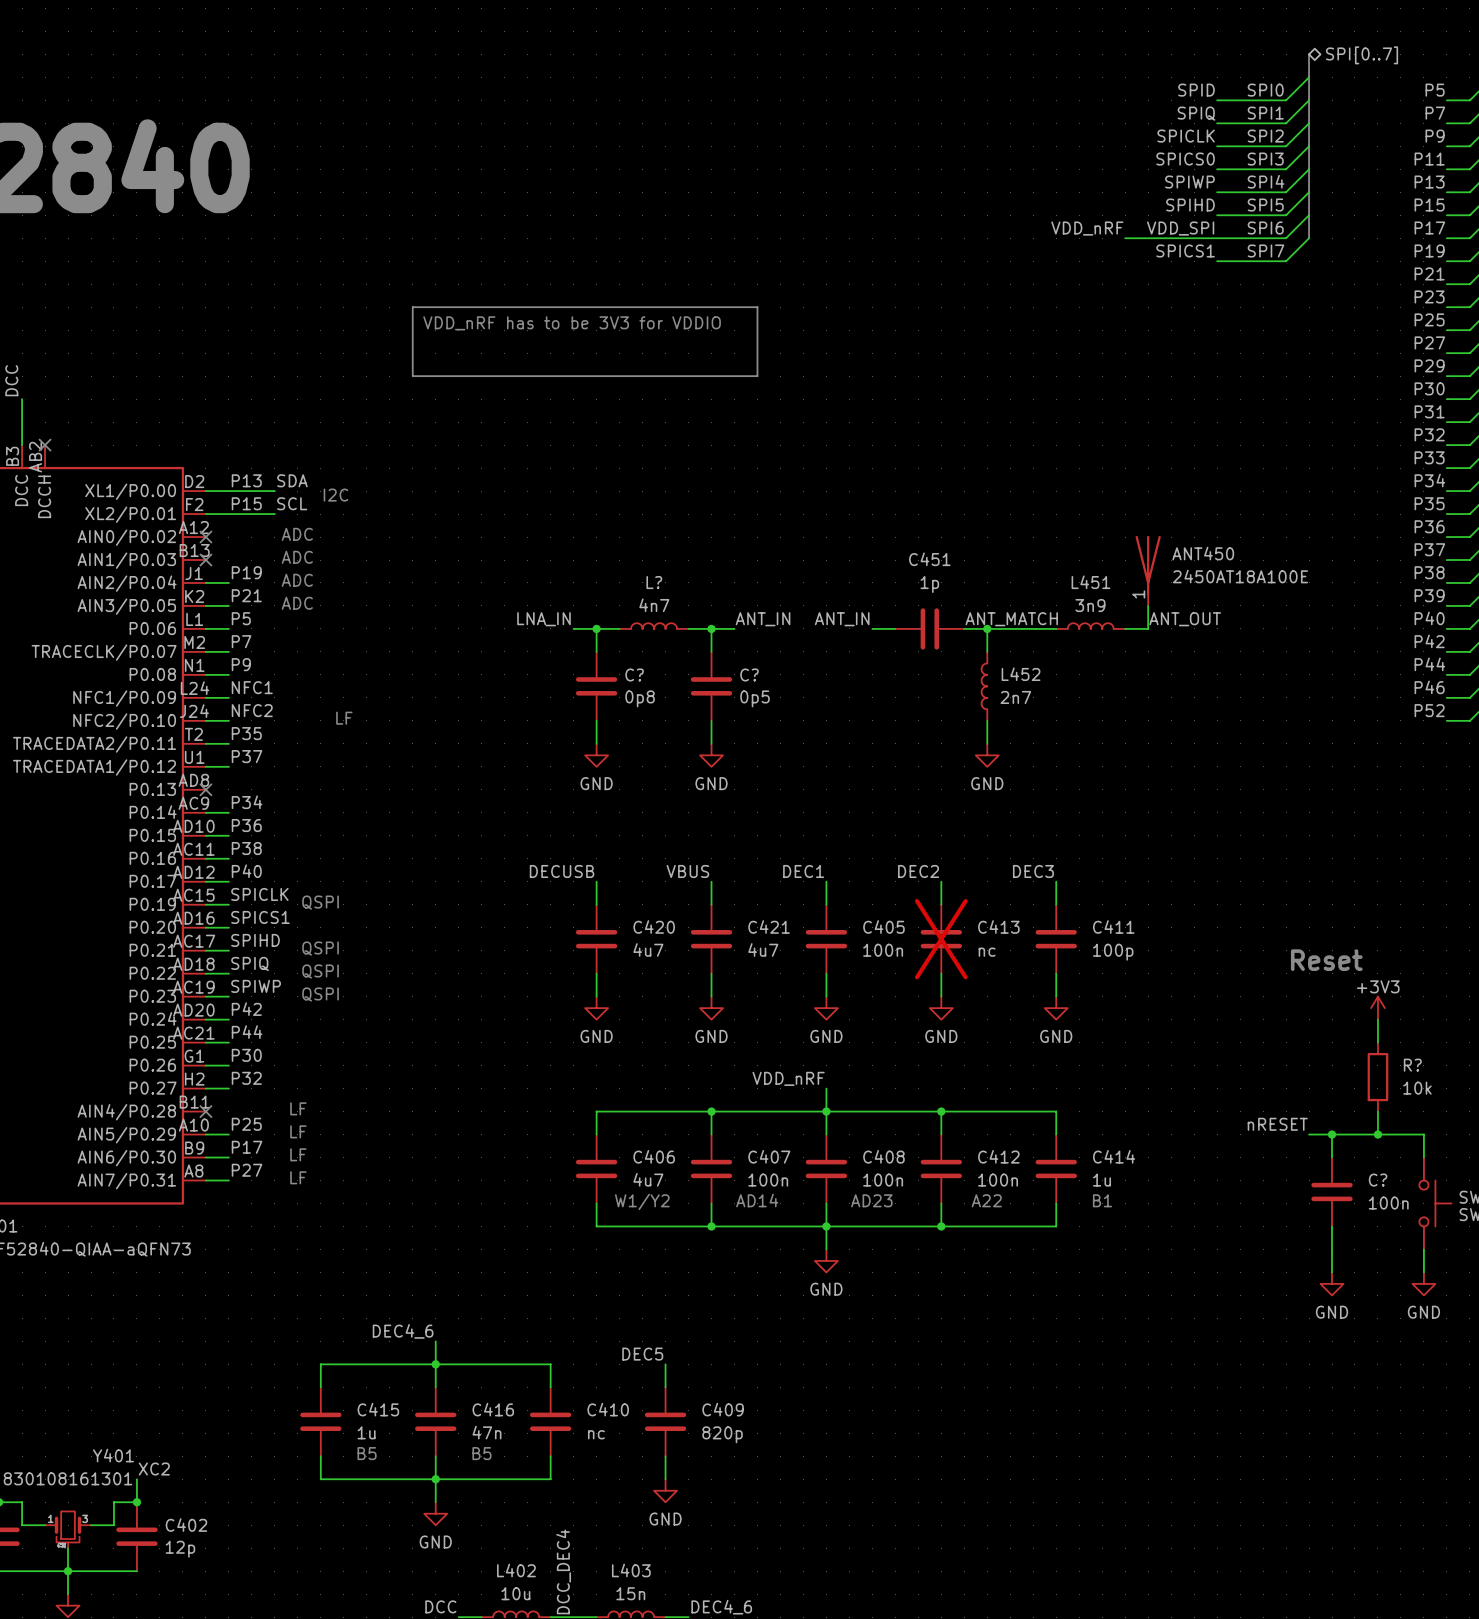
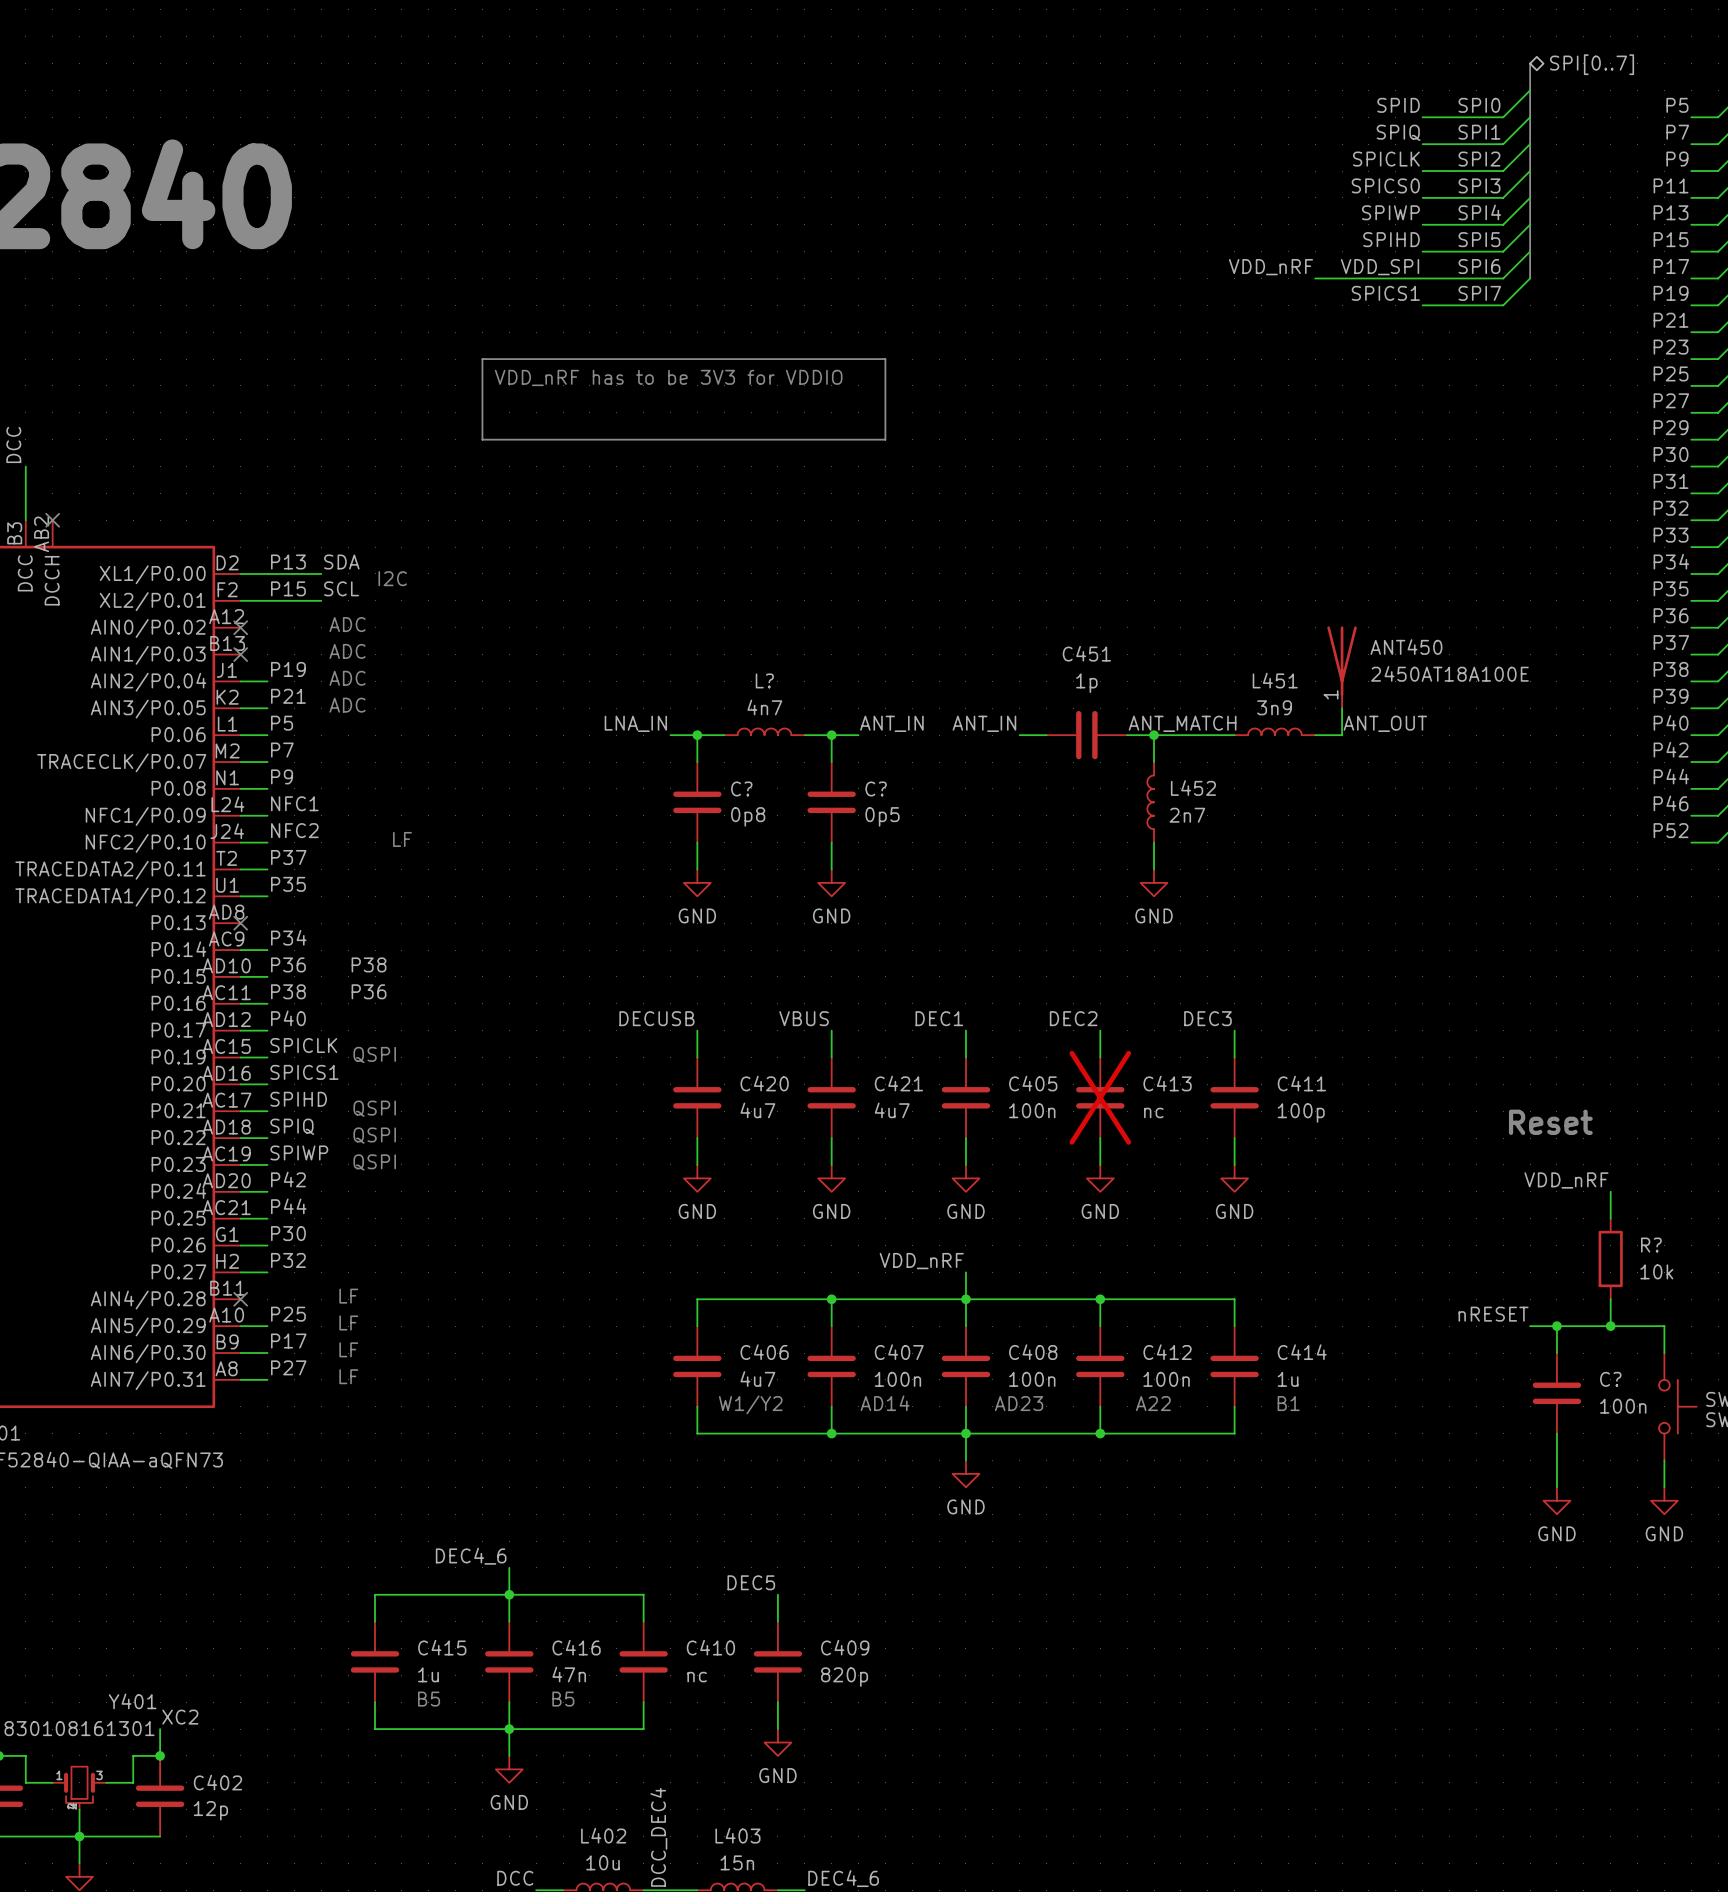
label: P35 (246, 733) -> P37 (288, 857)
label: P37 (247, 756) -> P35 (288, 884)
label: none -> P38 (369, 964)
label: none -> P36 (369, 991)
power symbol: +3V3 (1377, 1008) -> none
label: none -> VDD_nRF (1566, 1180)

